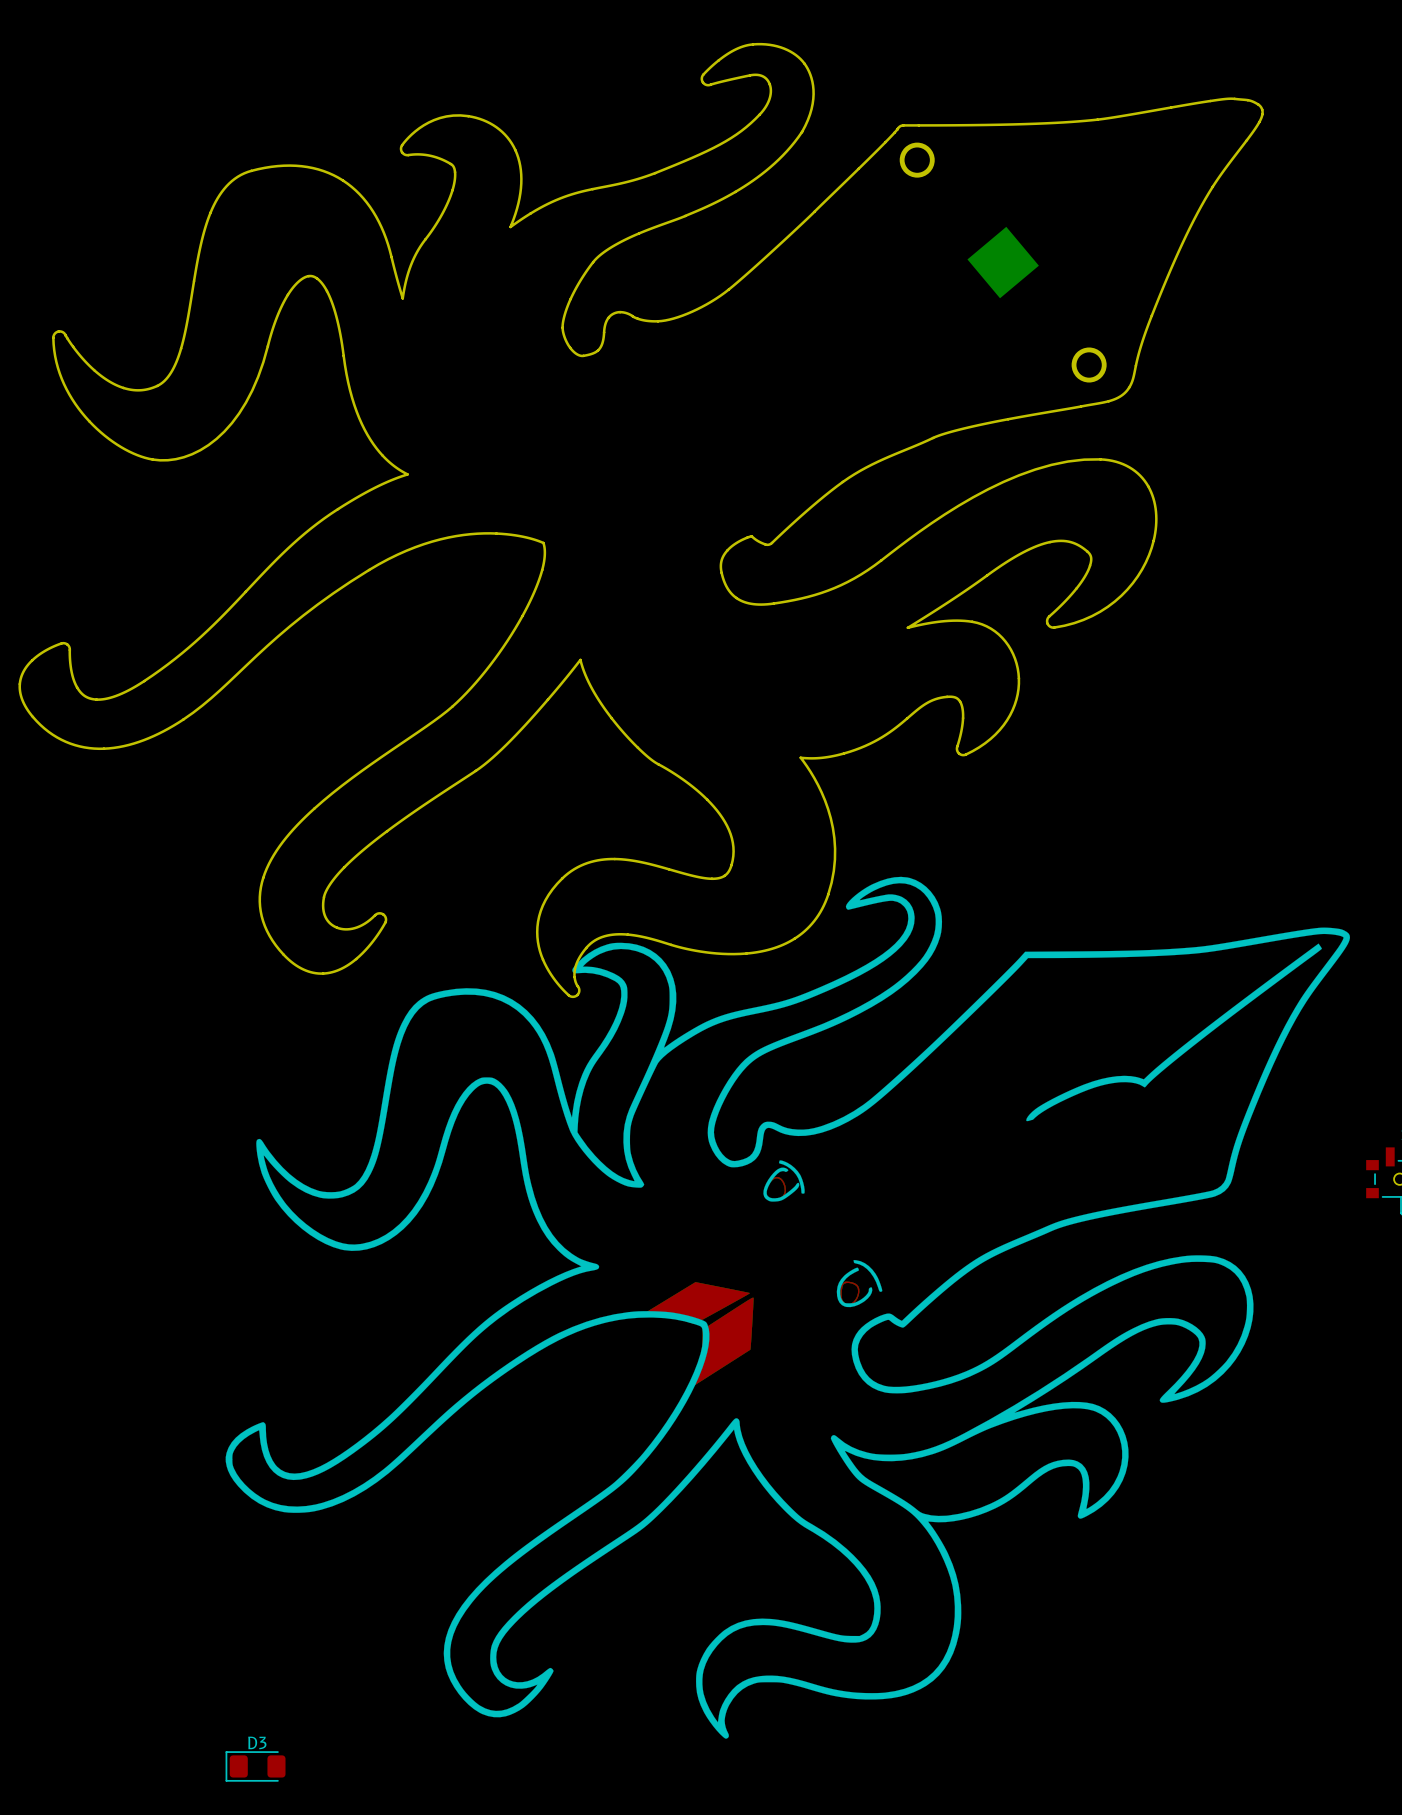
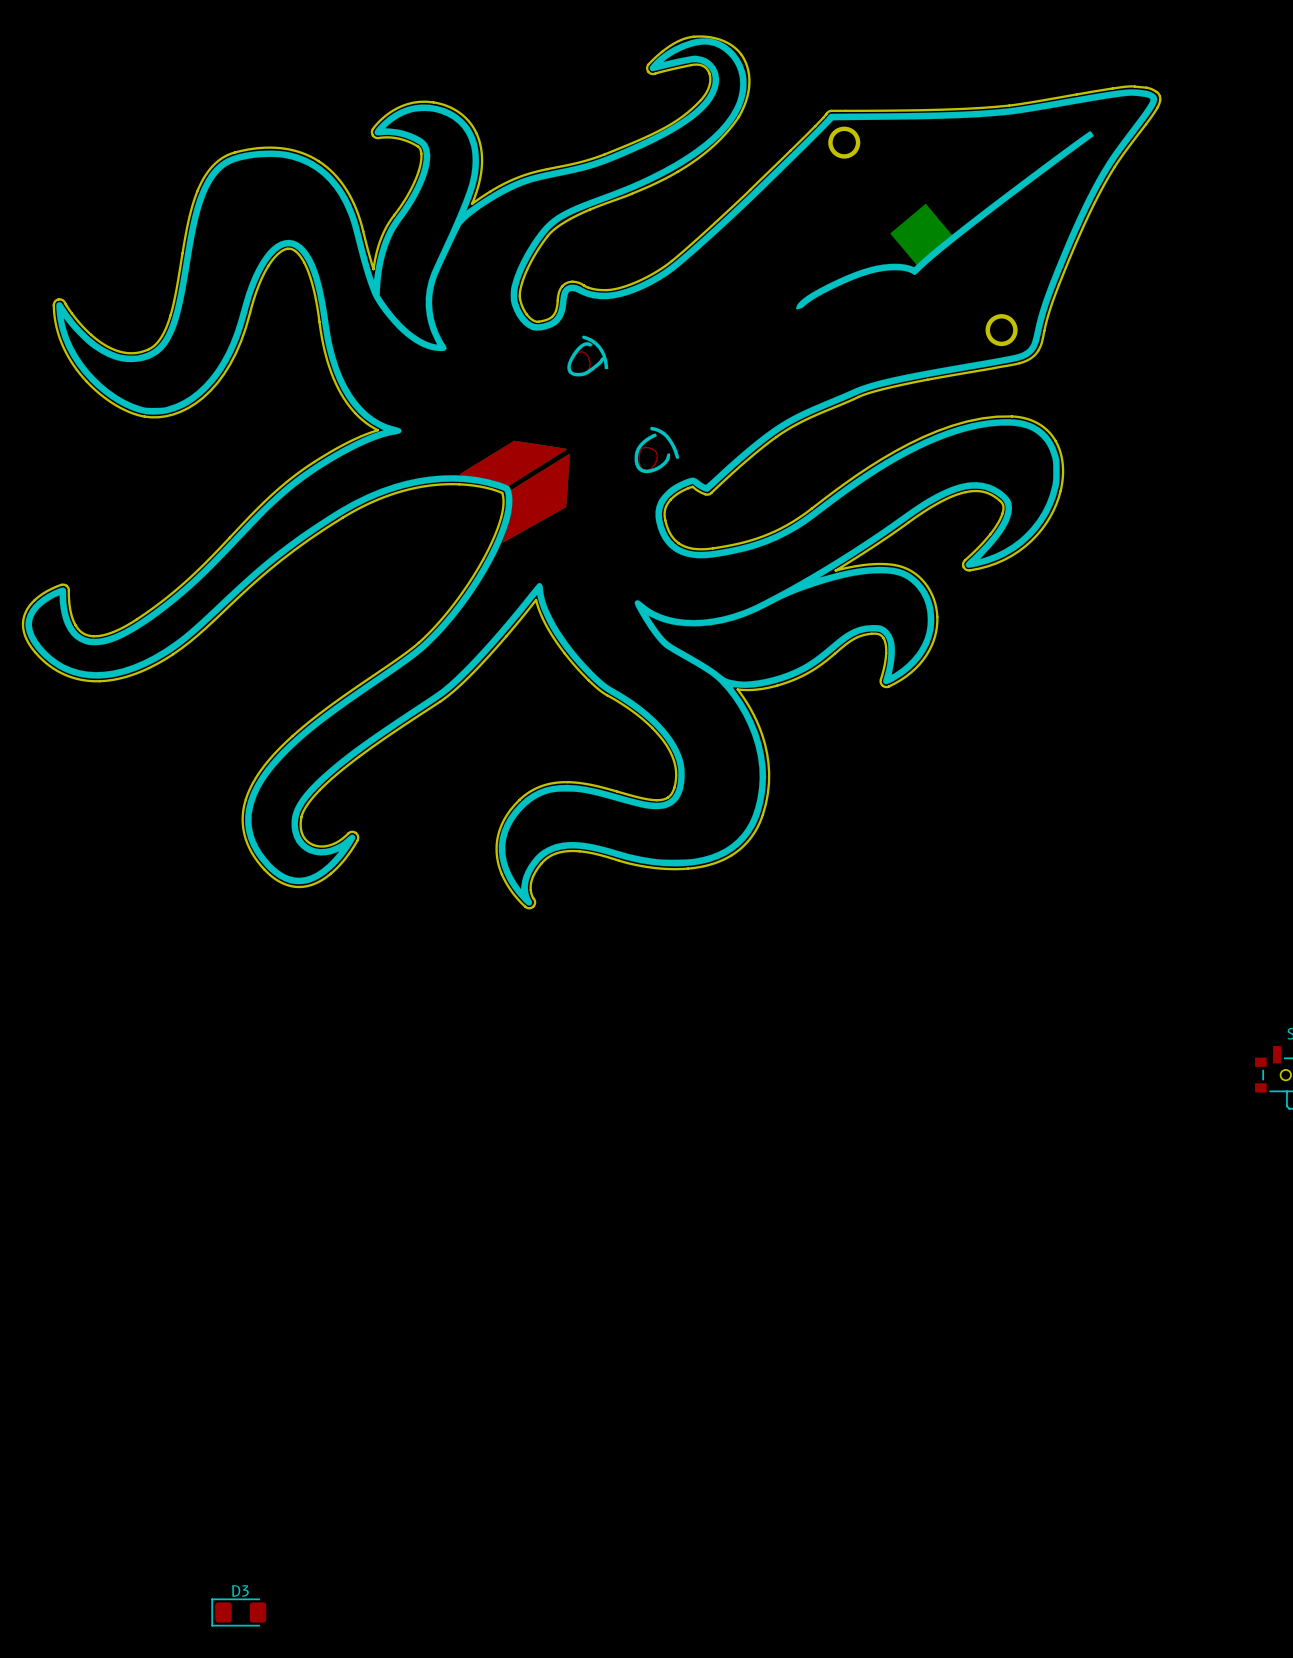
part: none -> (591, 471)
part: (787, 1307) -> none

